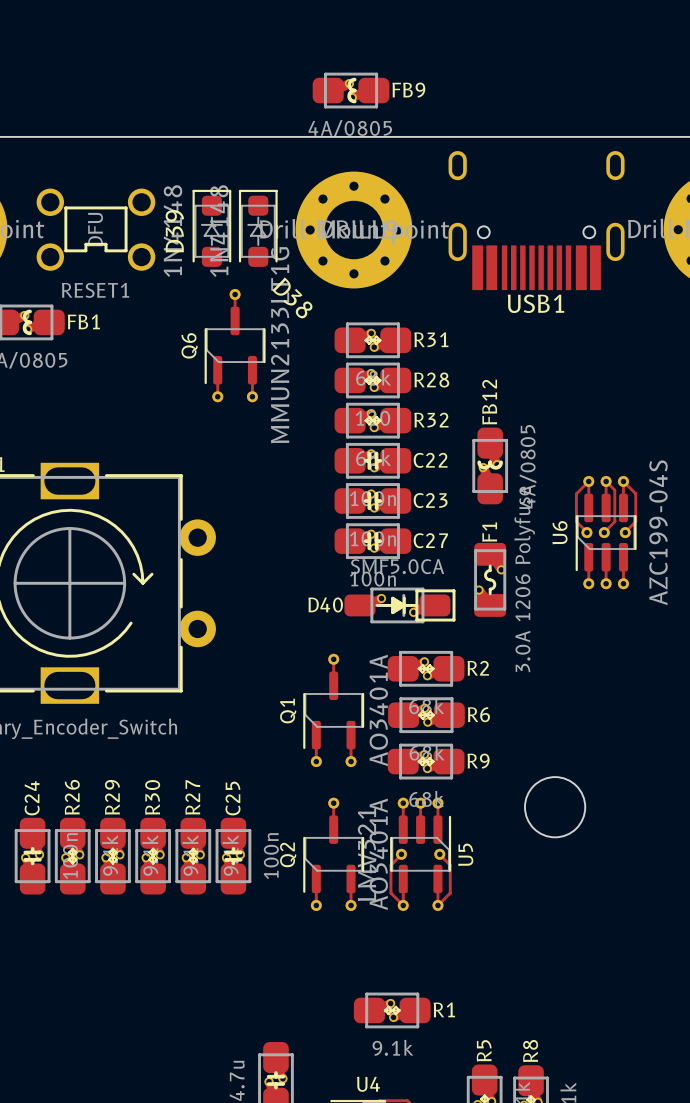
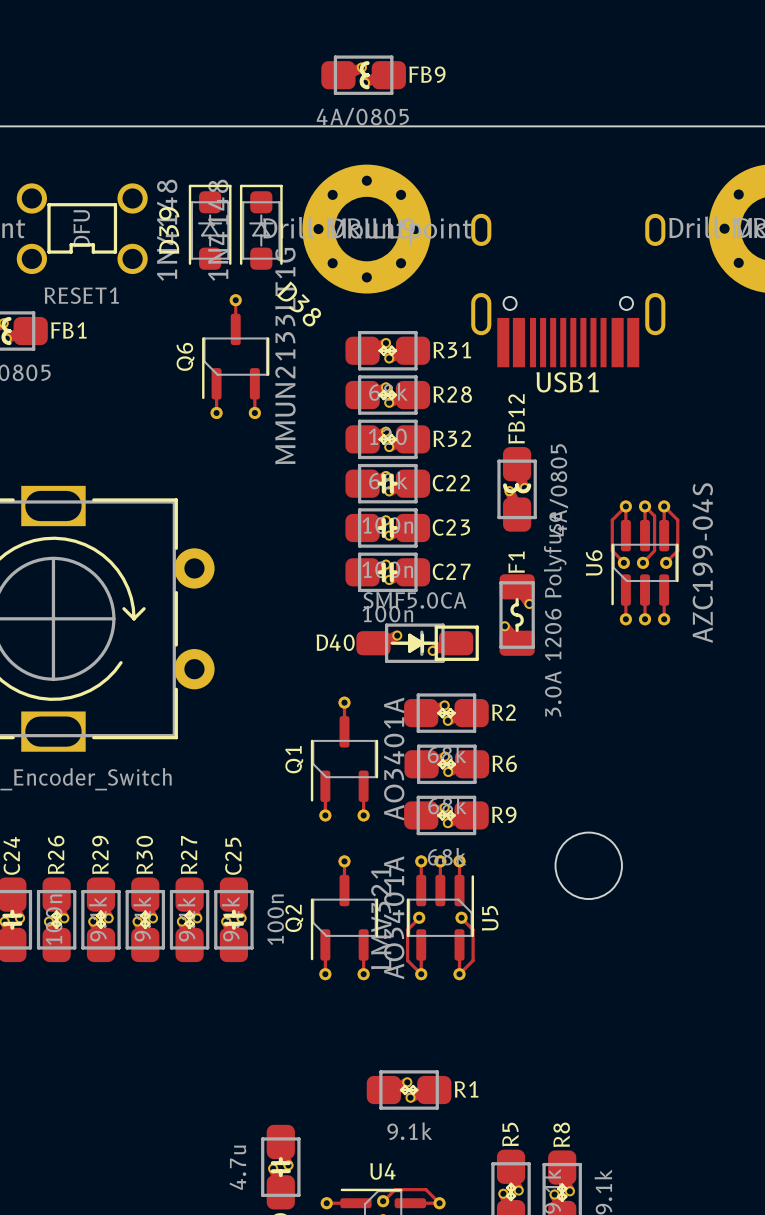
USB1 position: (536, 220) -> (568, 290)

